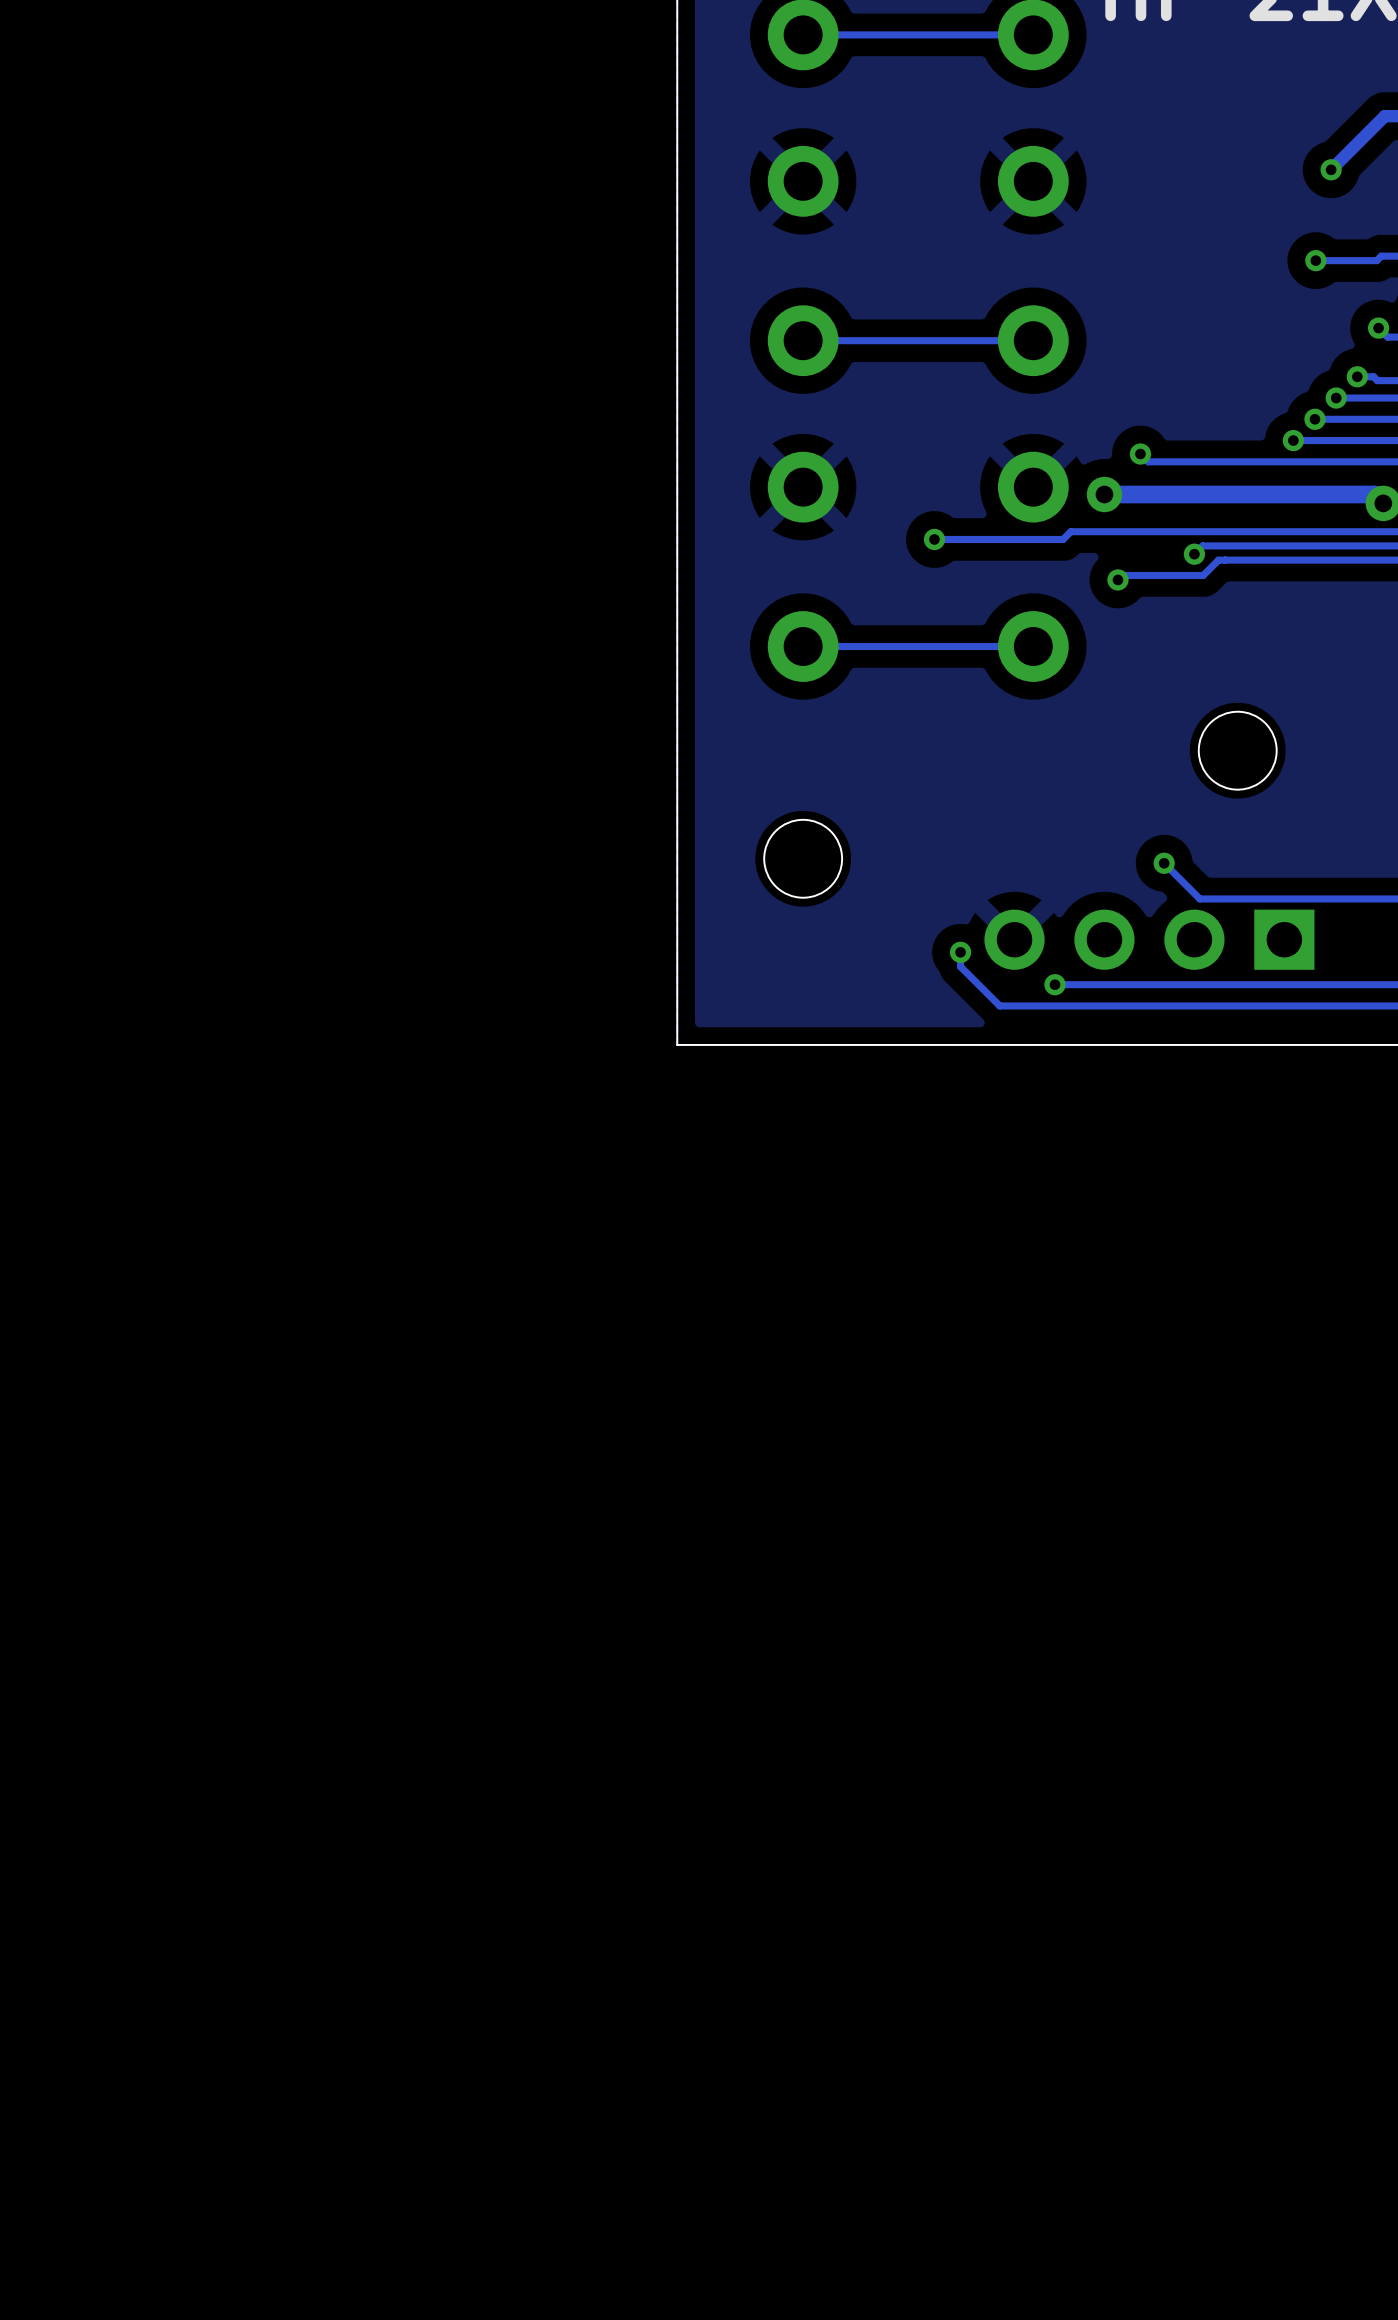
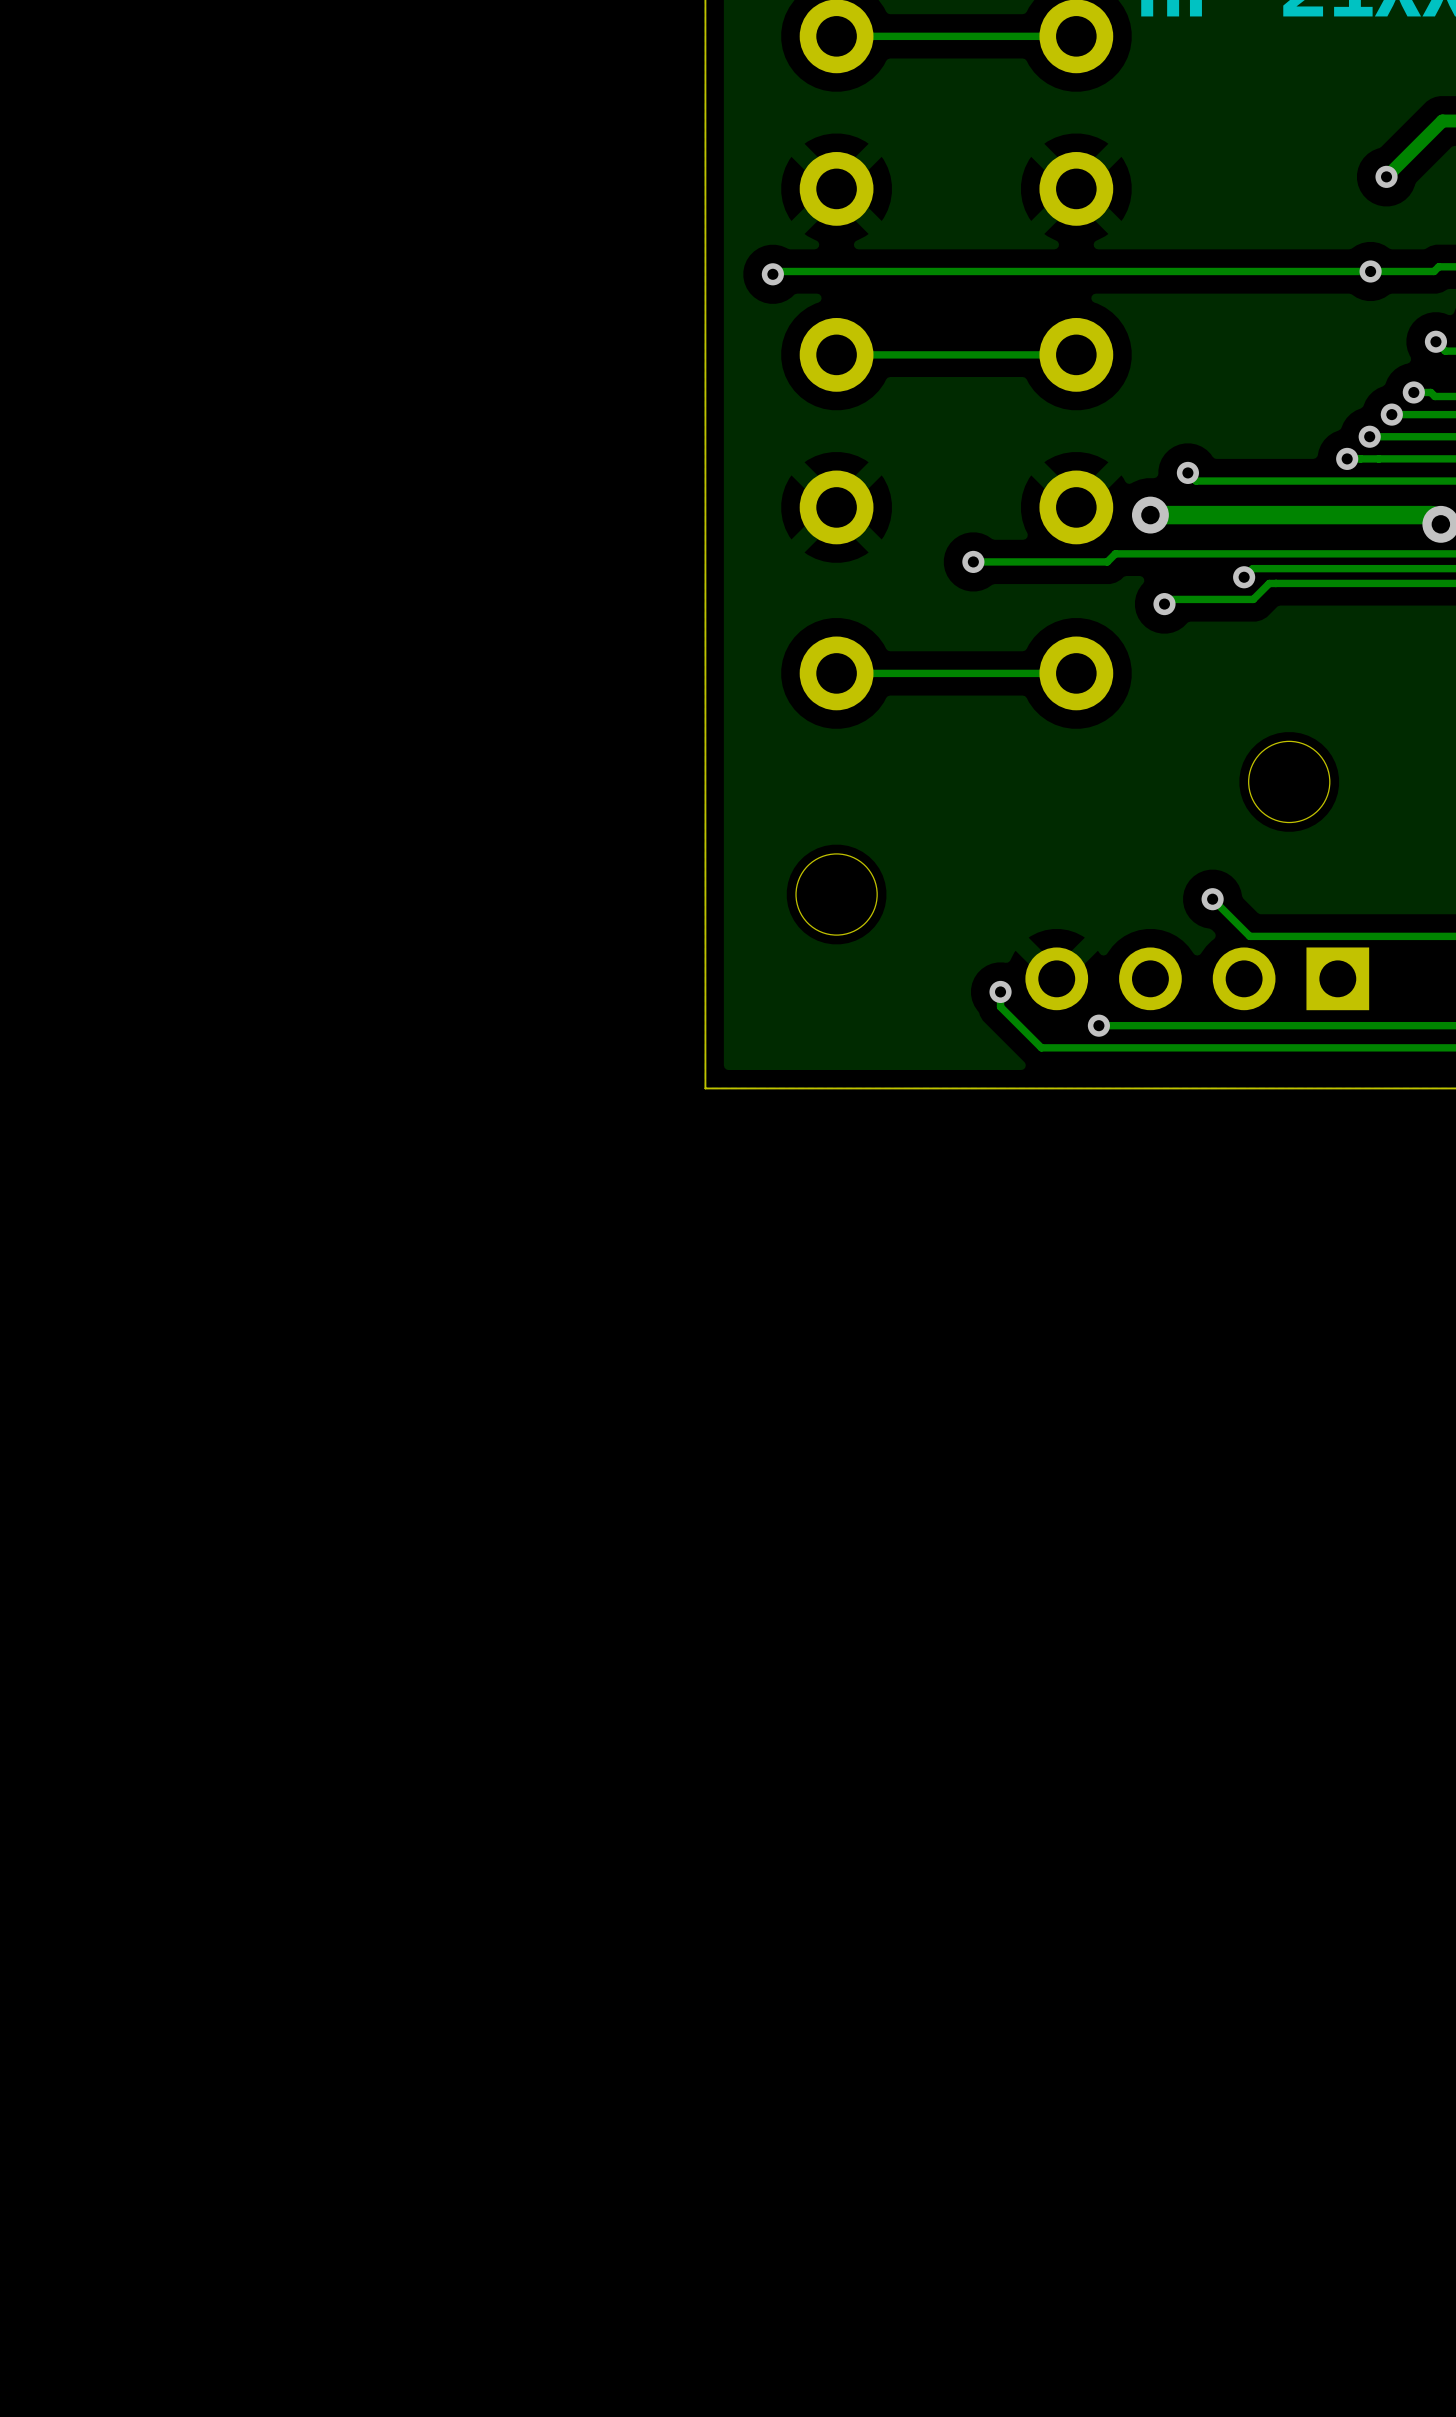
track: none -> (1370, 271) (775, 271) (772, 274)
via: none -> (772, 274)

